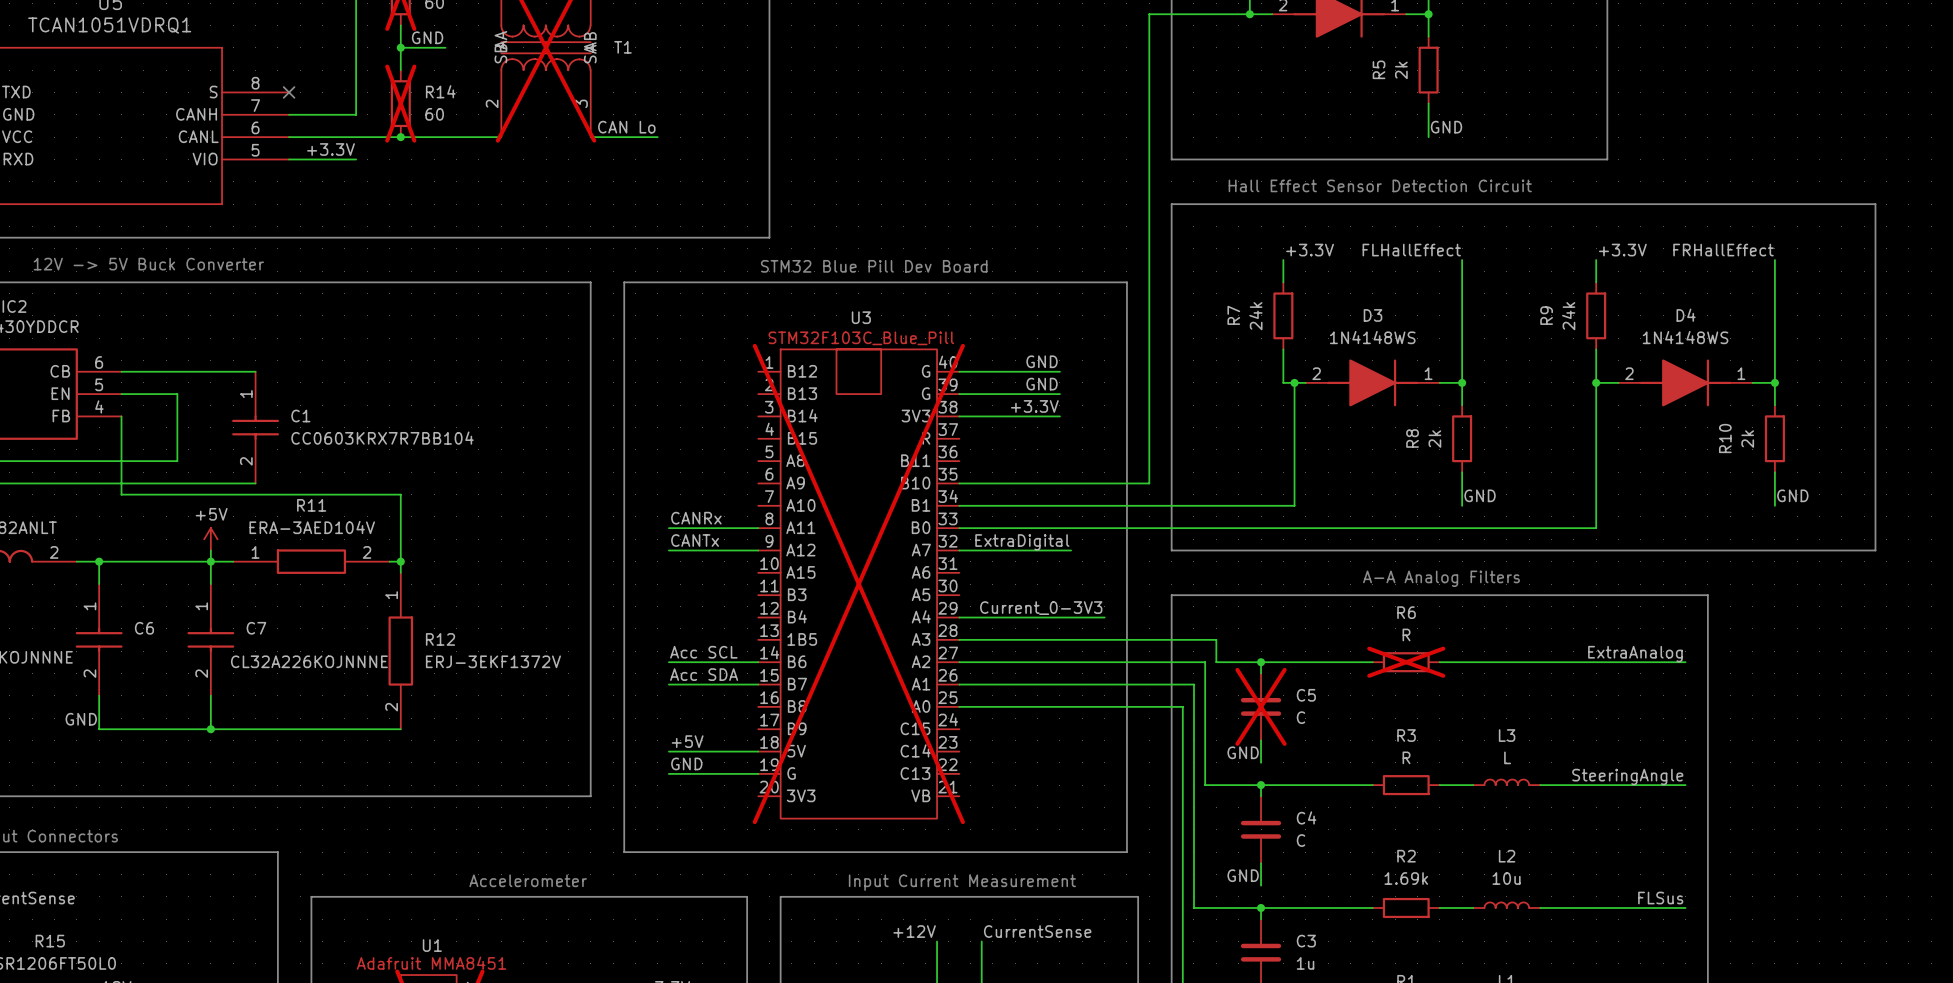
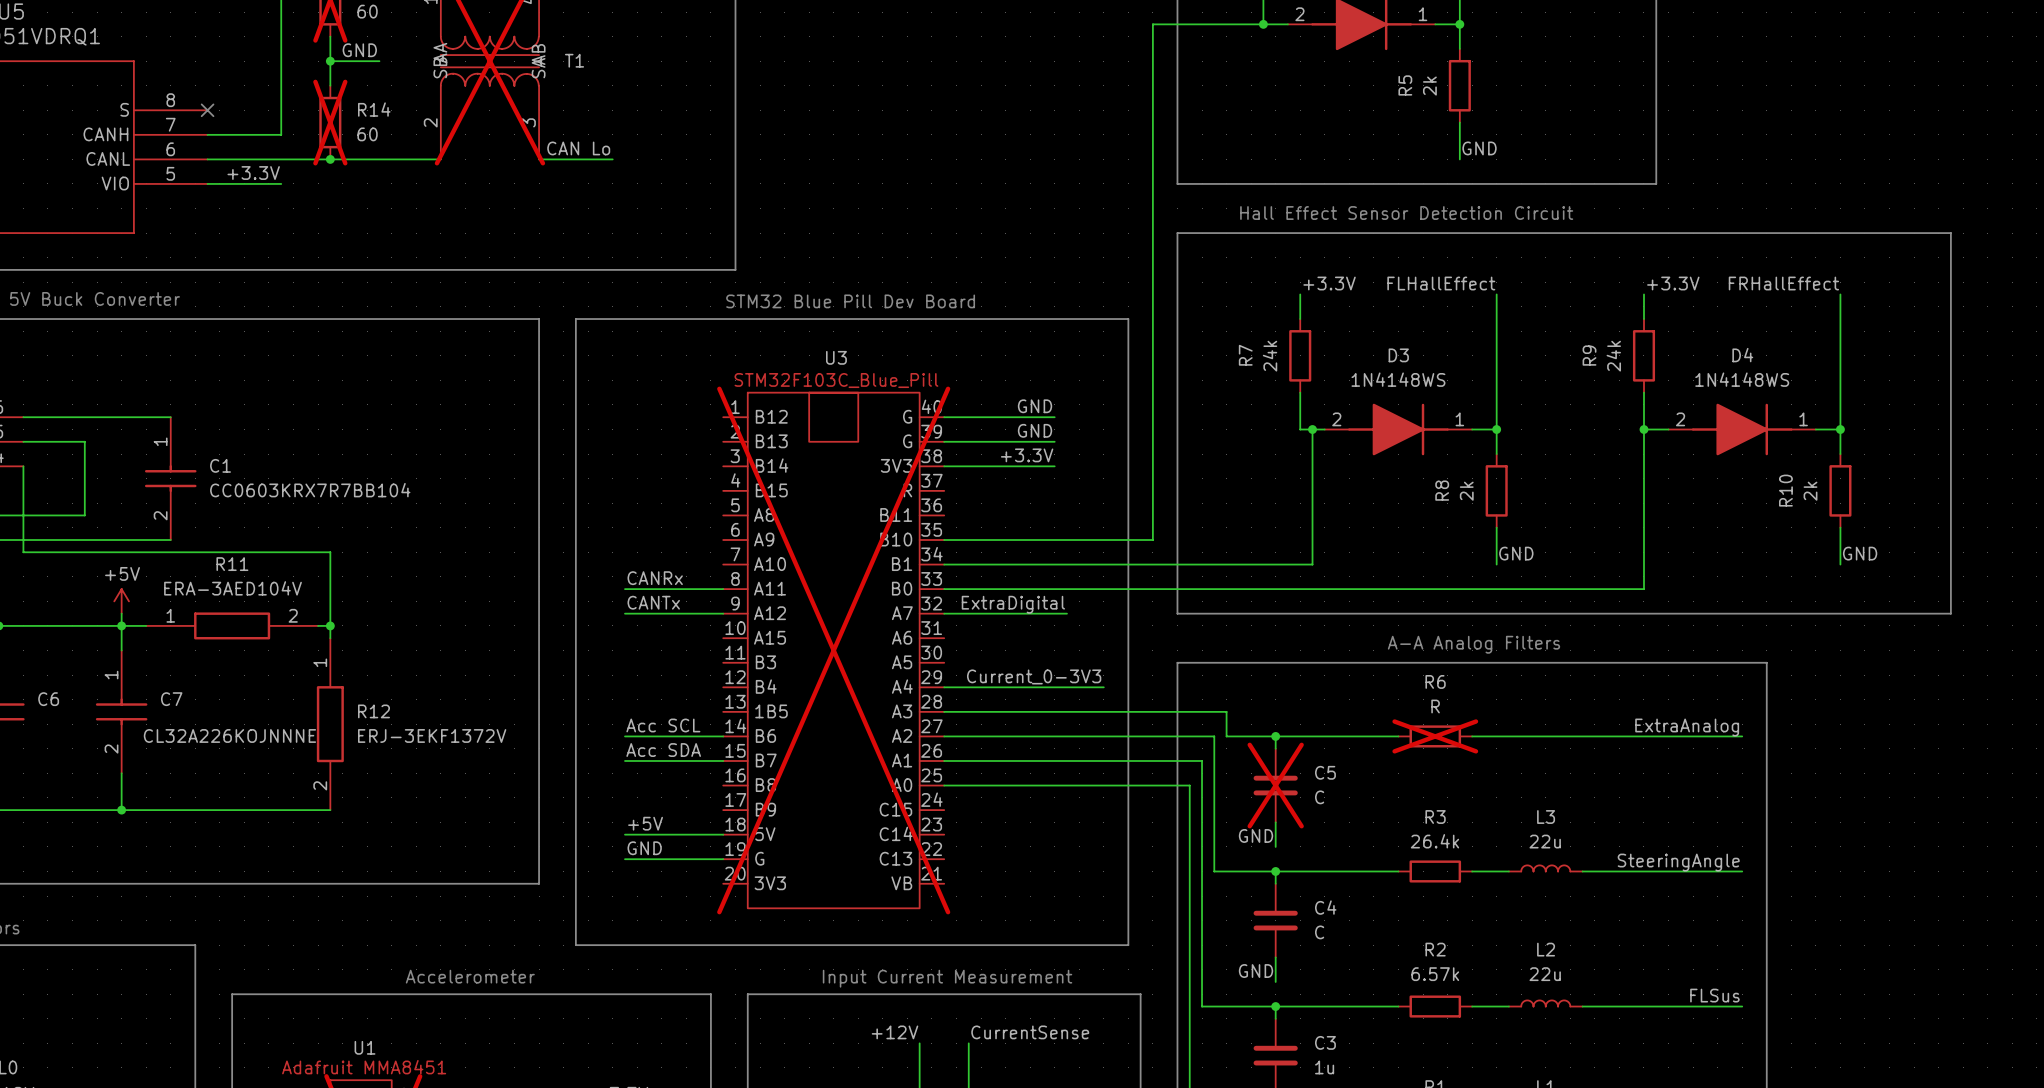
R3 value: R (1406, 757) -> 26.4k (1434, 841)
L3 value: L (1507, 757) -> 22u (1545, 841)
R2 value: 1.69k (1406, 878) -> 6.57k (1435, 974)
L2 value: 10u (1506, 878) -> 22u (1545, 974)

